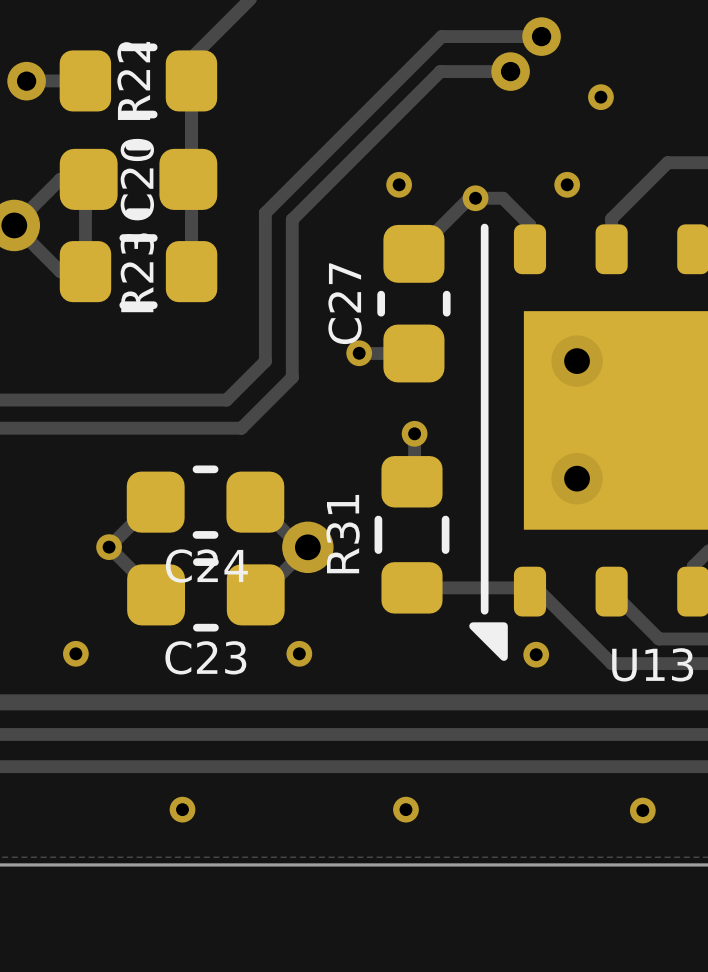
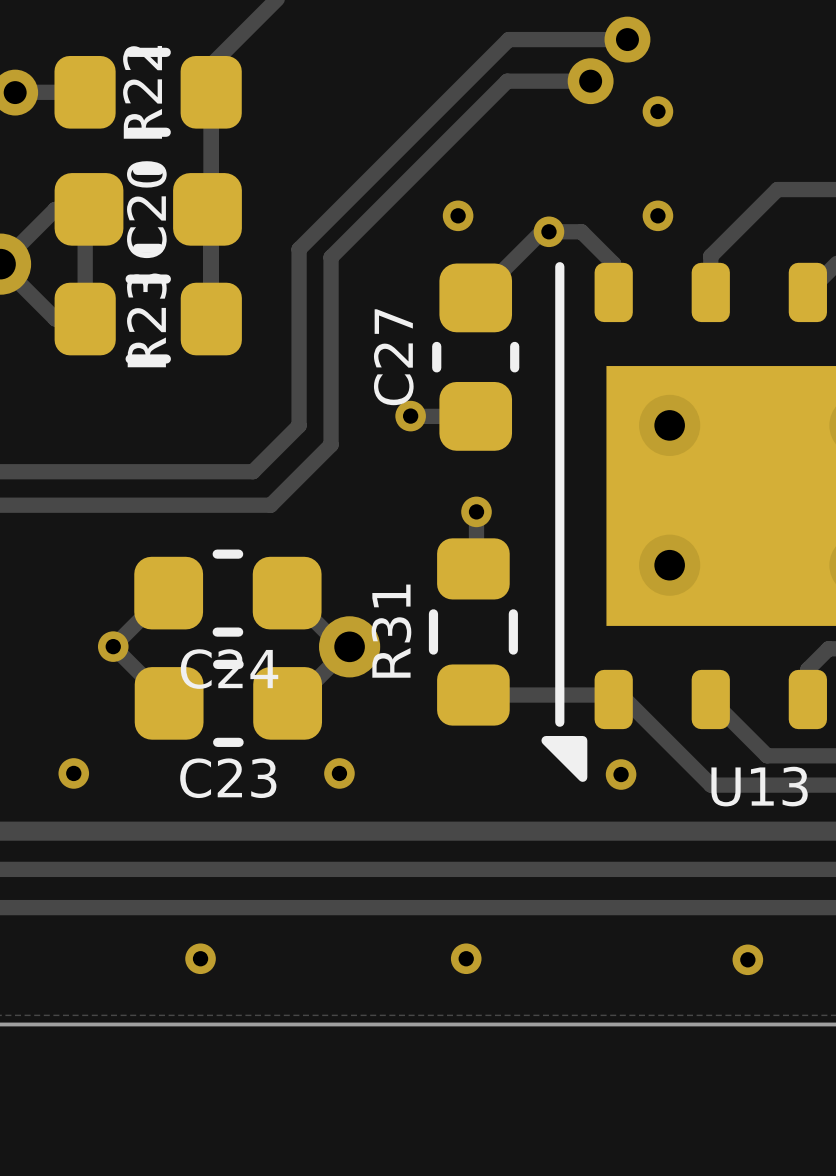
via position: (600, 97) -> (657, 111)

